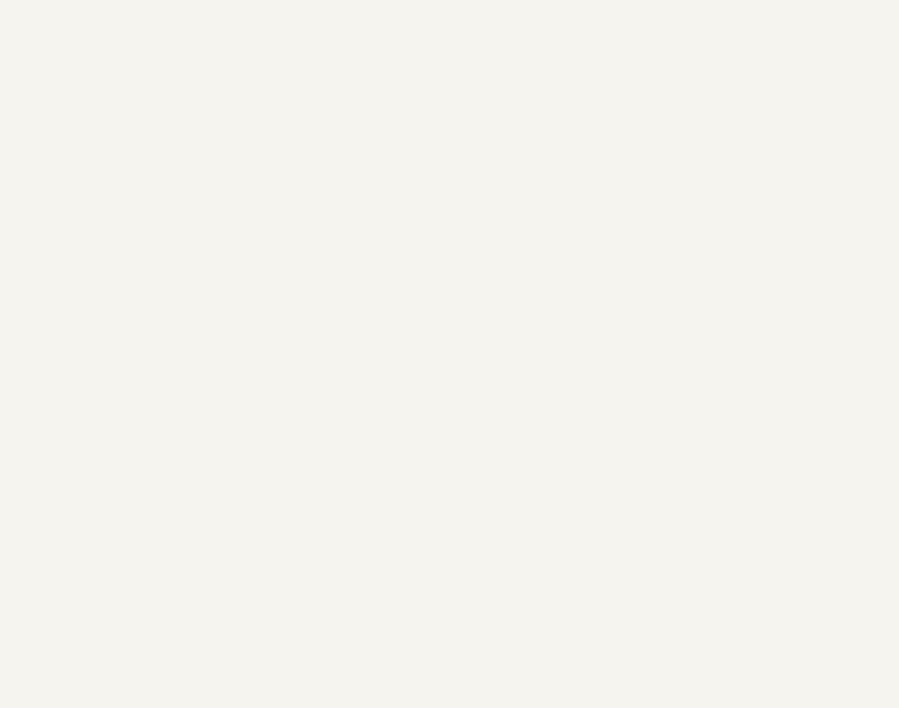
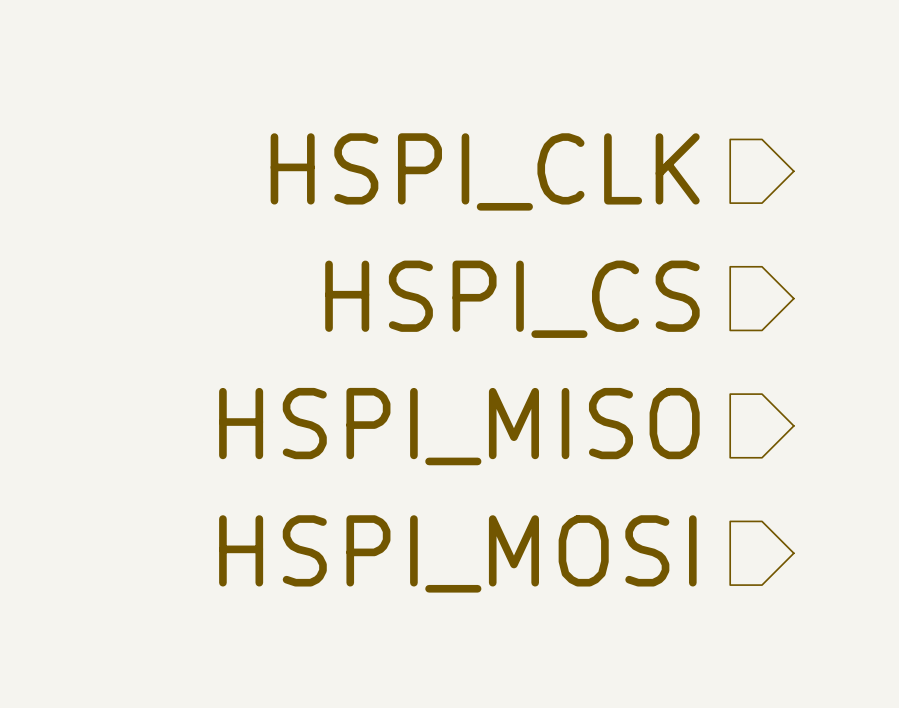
hierarchical label: none -> HSPI_CLK (485, 171)
hierarchical label: none -> HSPI_CS (512, 299)
hierarchical label: none -> HSPI_MISO (459, 426)
hierarchical label: none -> HSPI_MOSI (457, 553)

